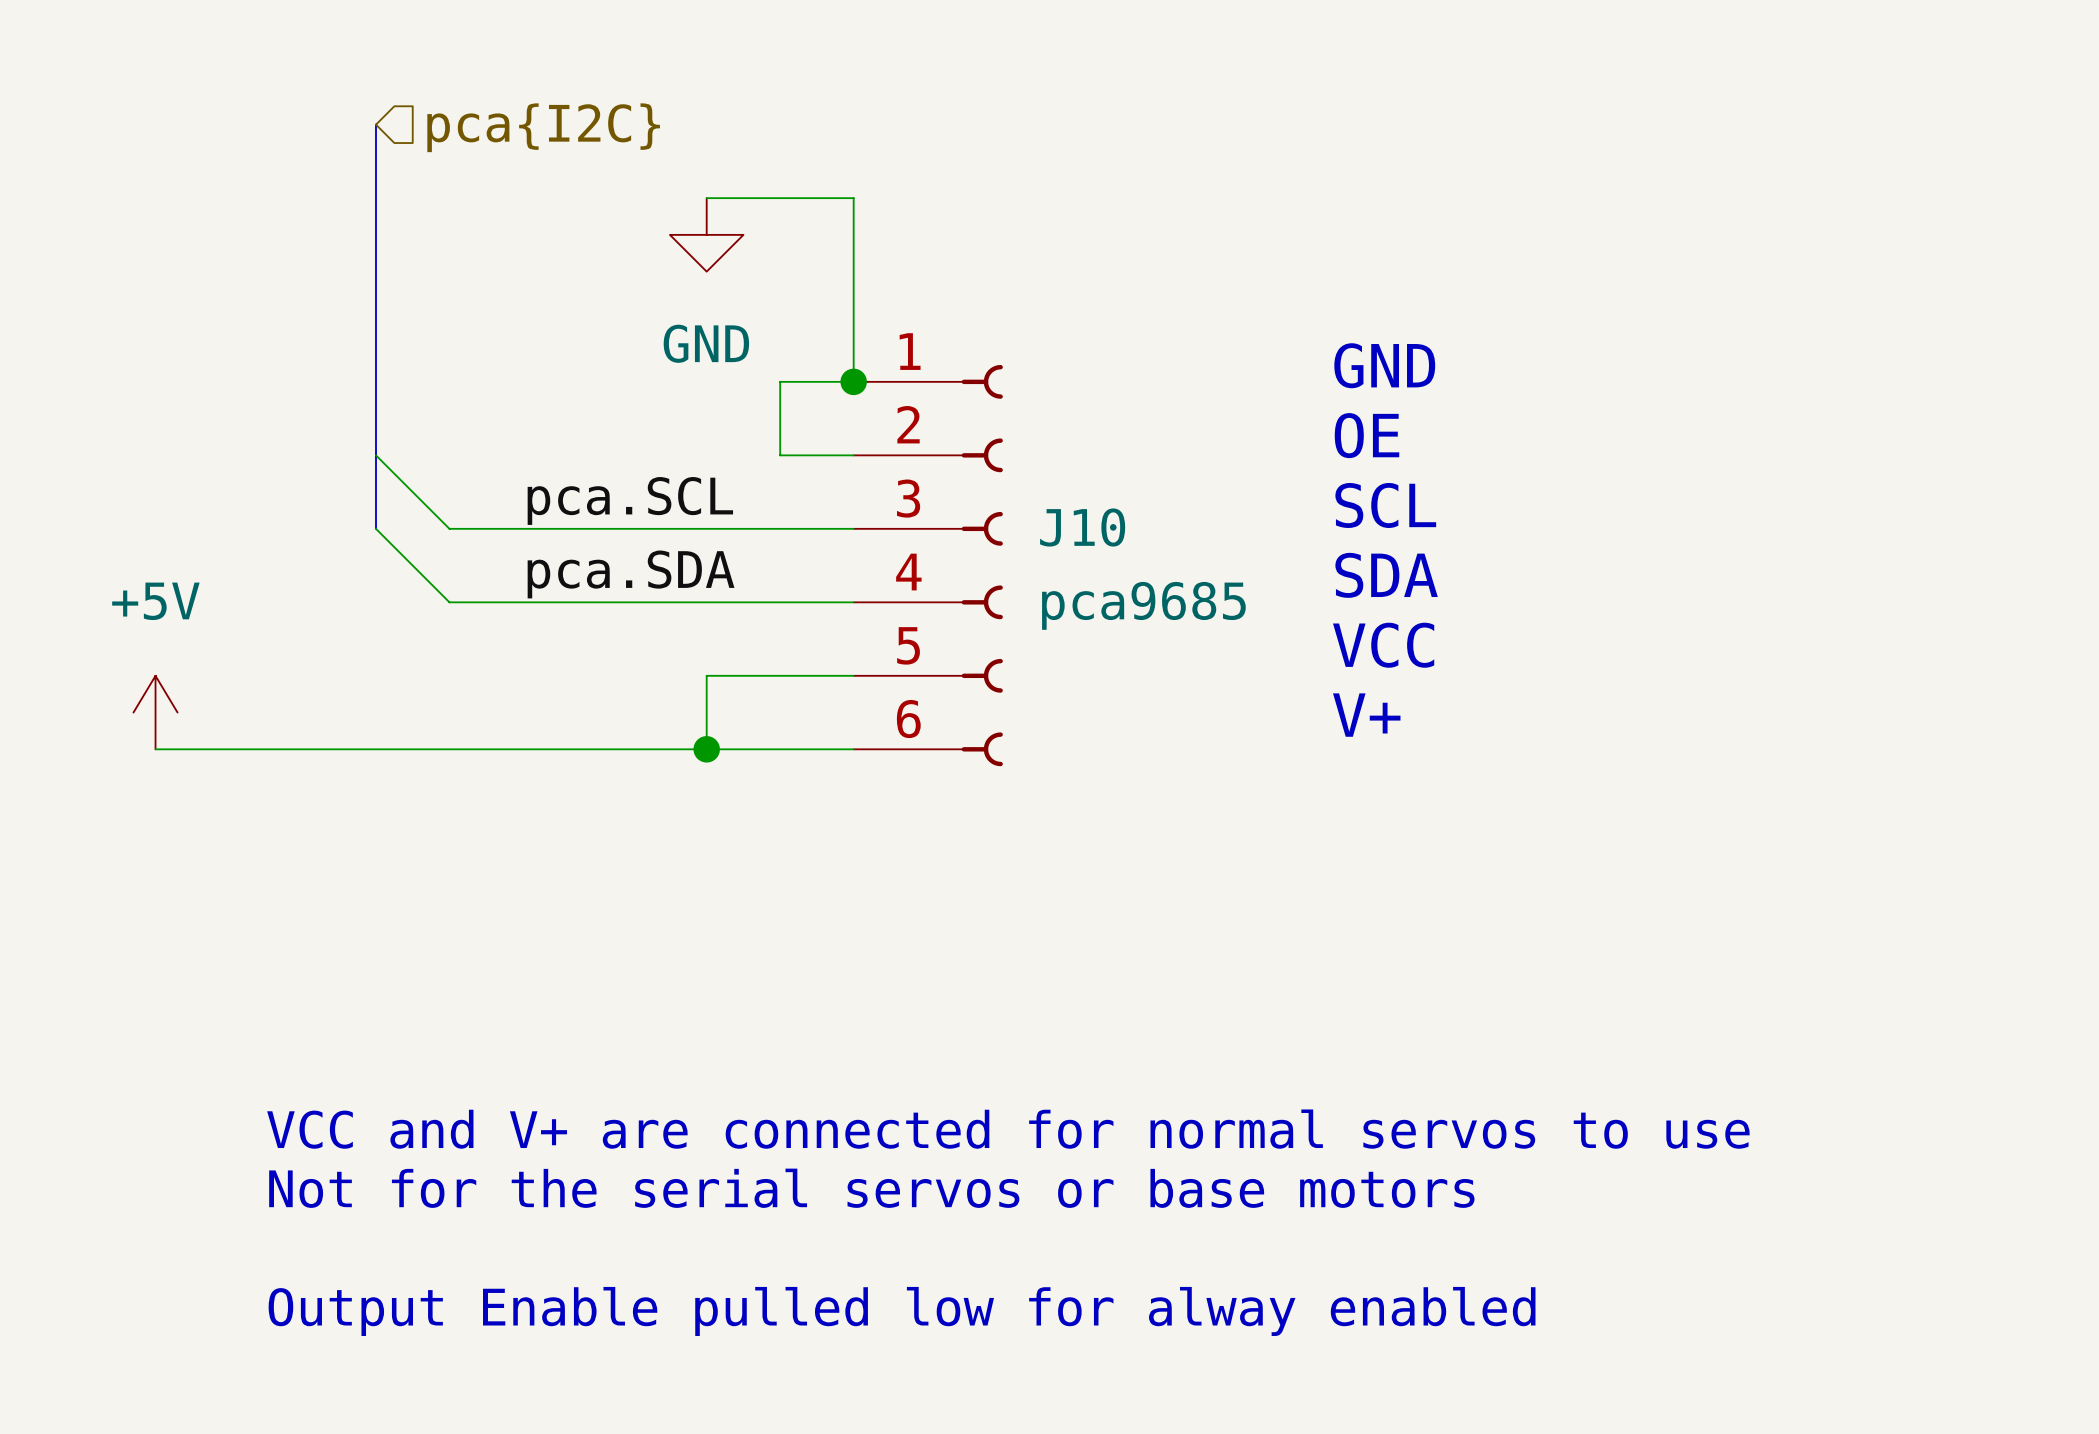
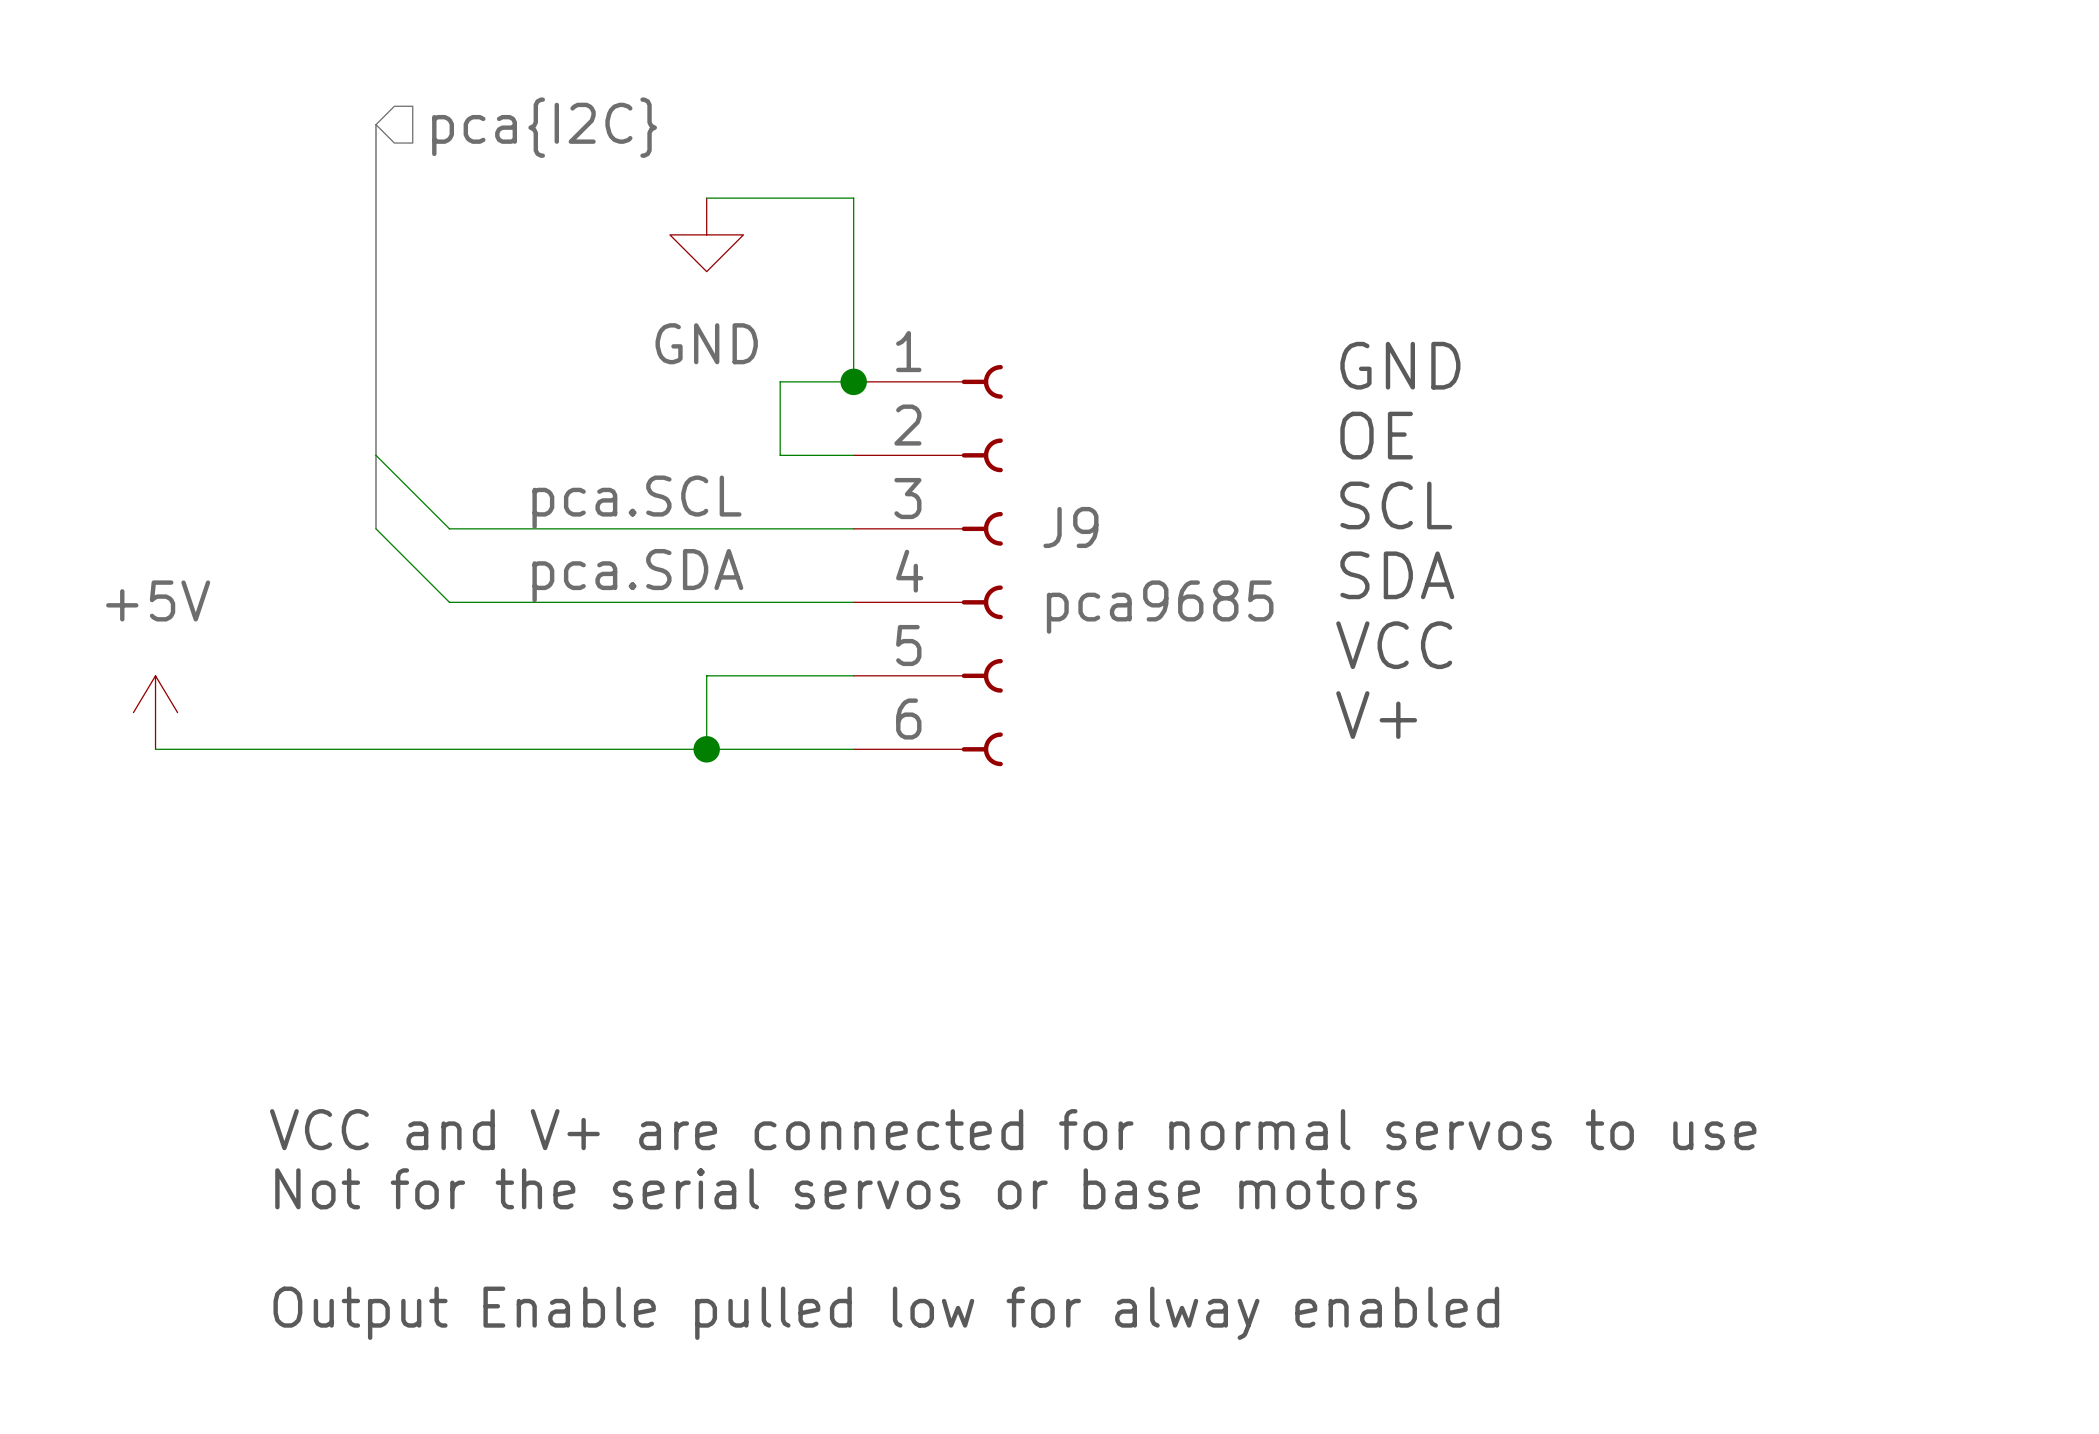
J10 name: J10 (1082, 527) -> J9 (1070, 527)

